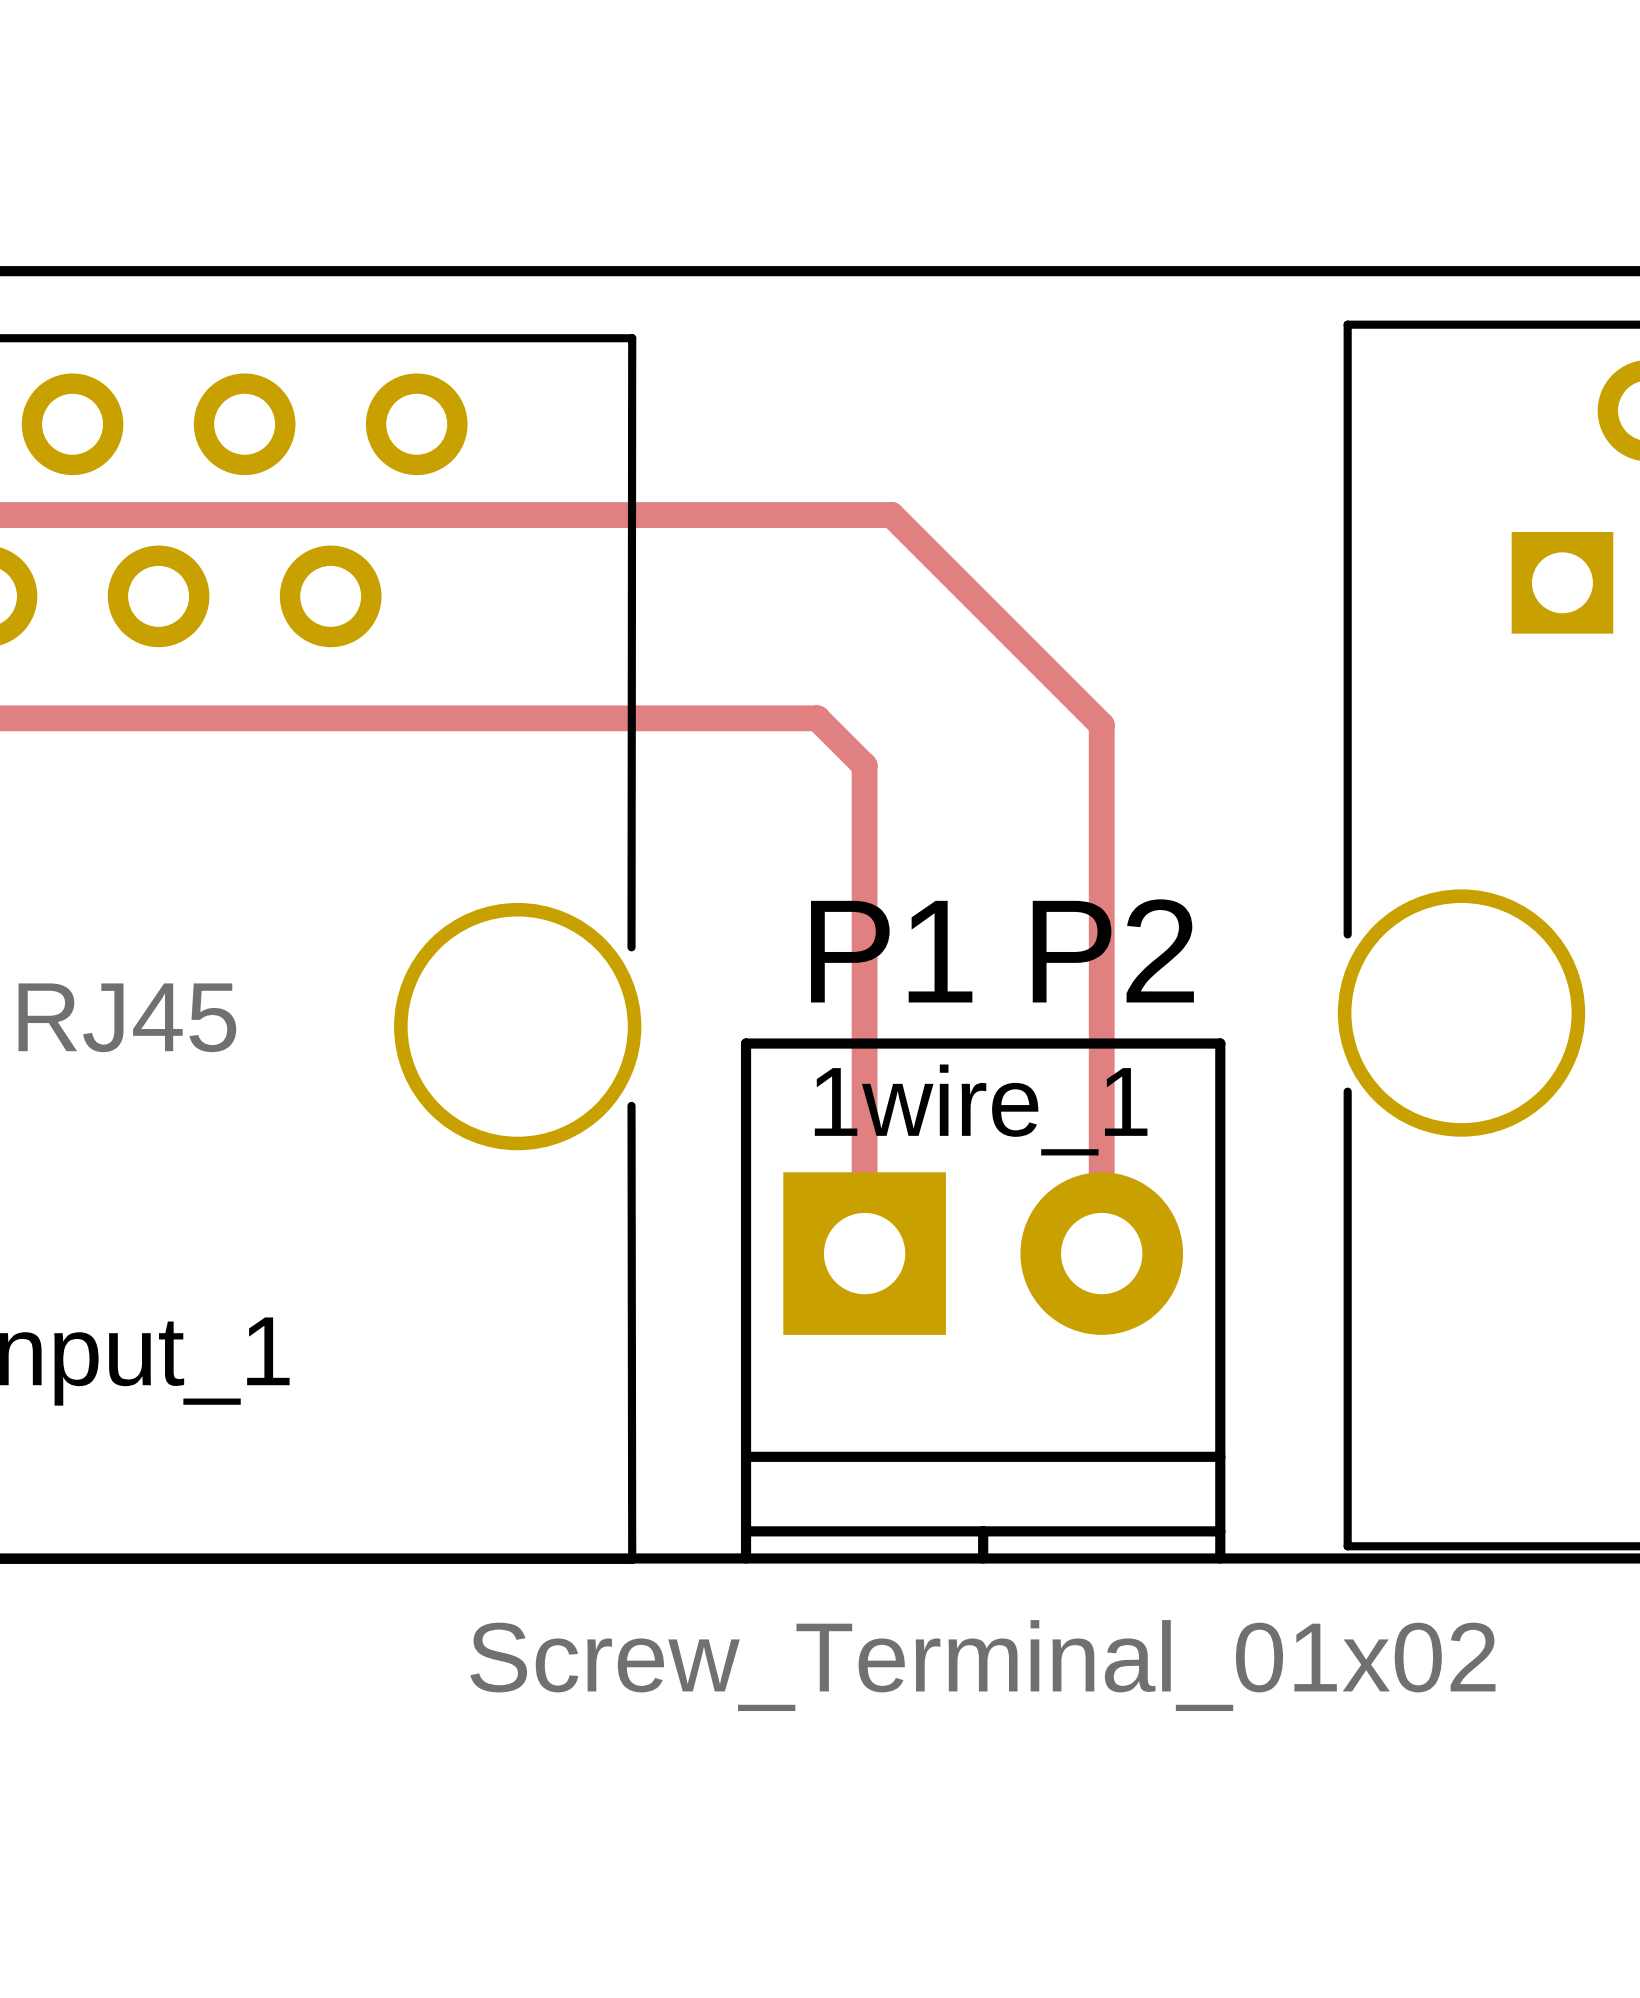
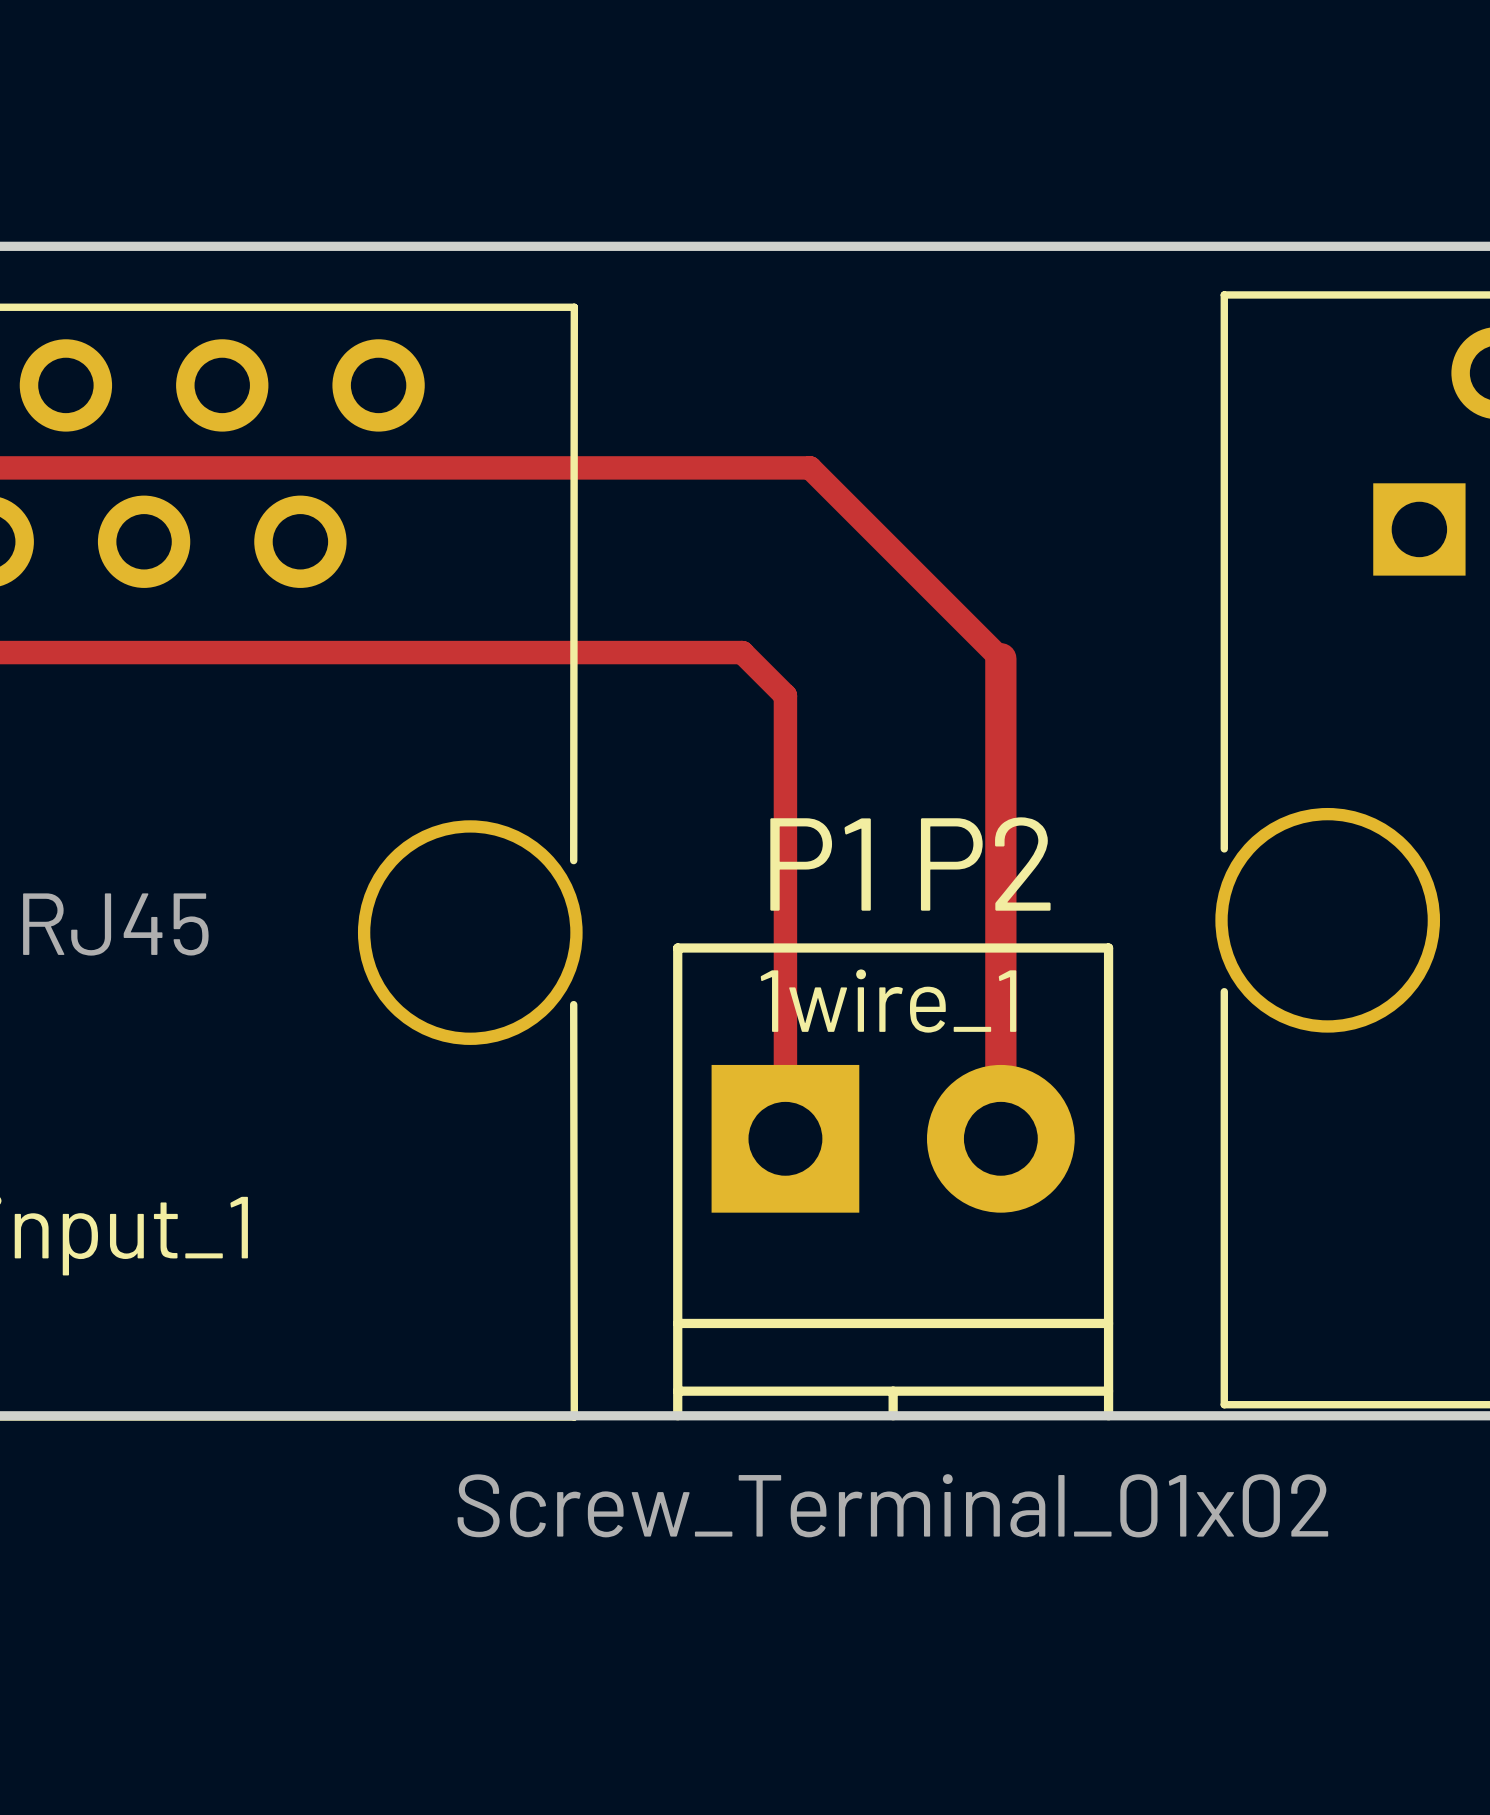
top track width: thin (1101, 725) (1101, 1253) -> thick (1000, 658) (1000, 1138)

